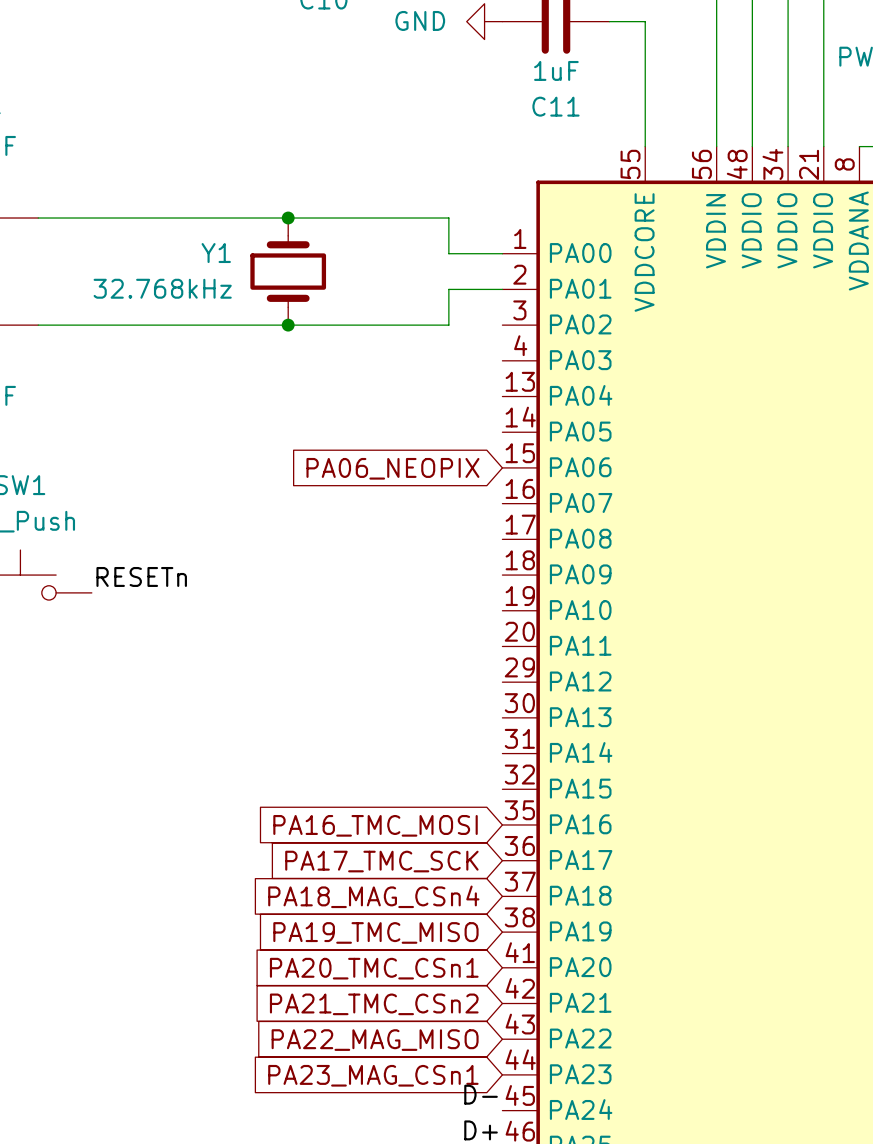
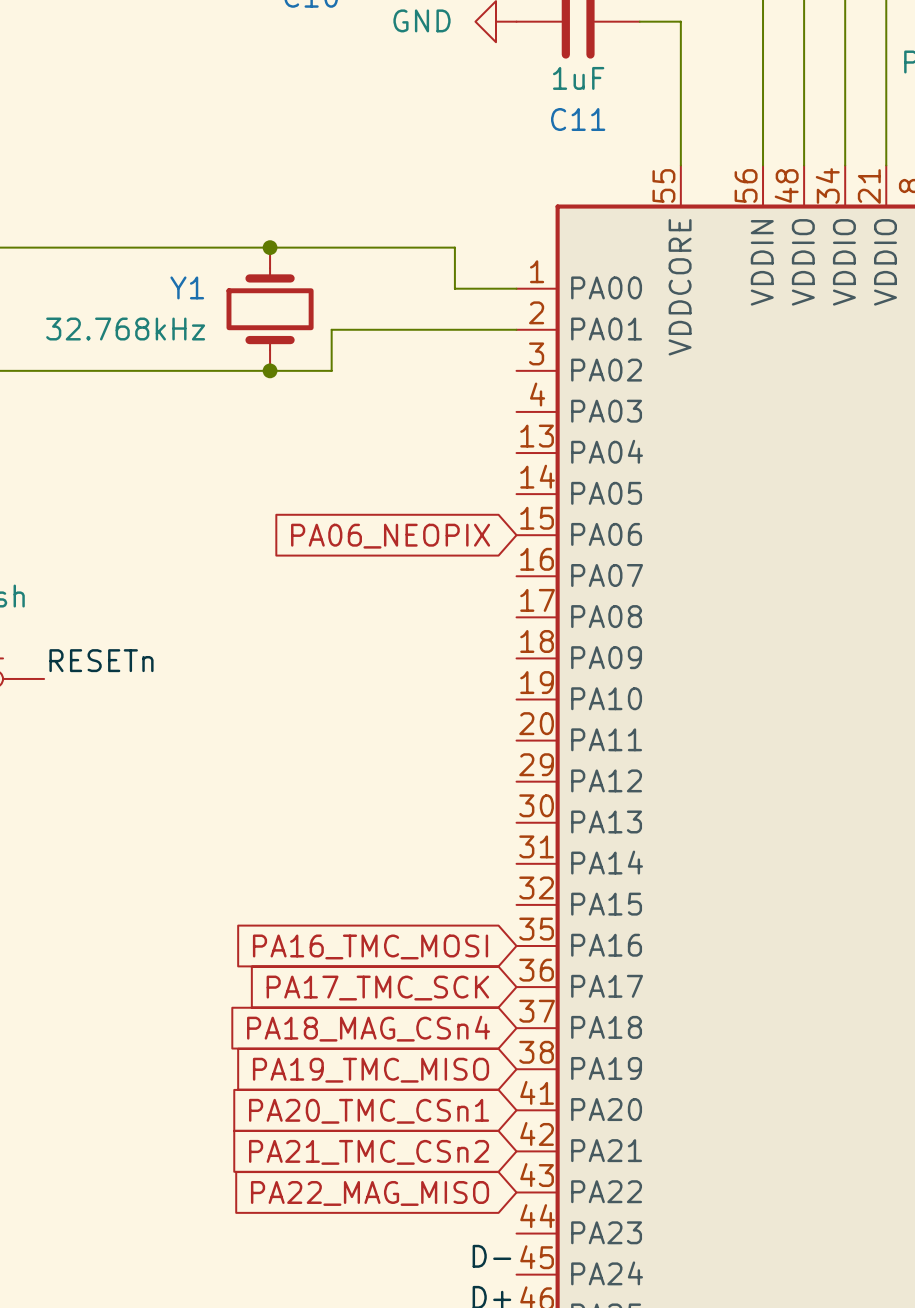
wire: (448, 289) (448, 325) (341, 325) -> (454, 329) (331, 329) (331, 370)
global label: PA23_MAG_CSn1 (373, 1075) -> none

